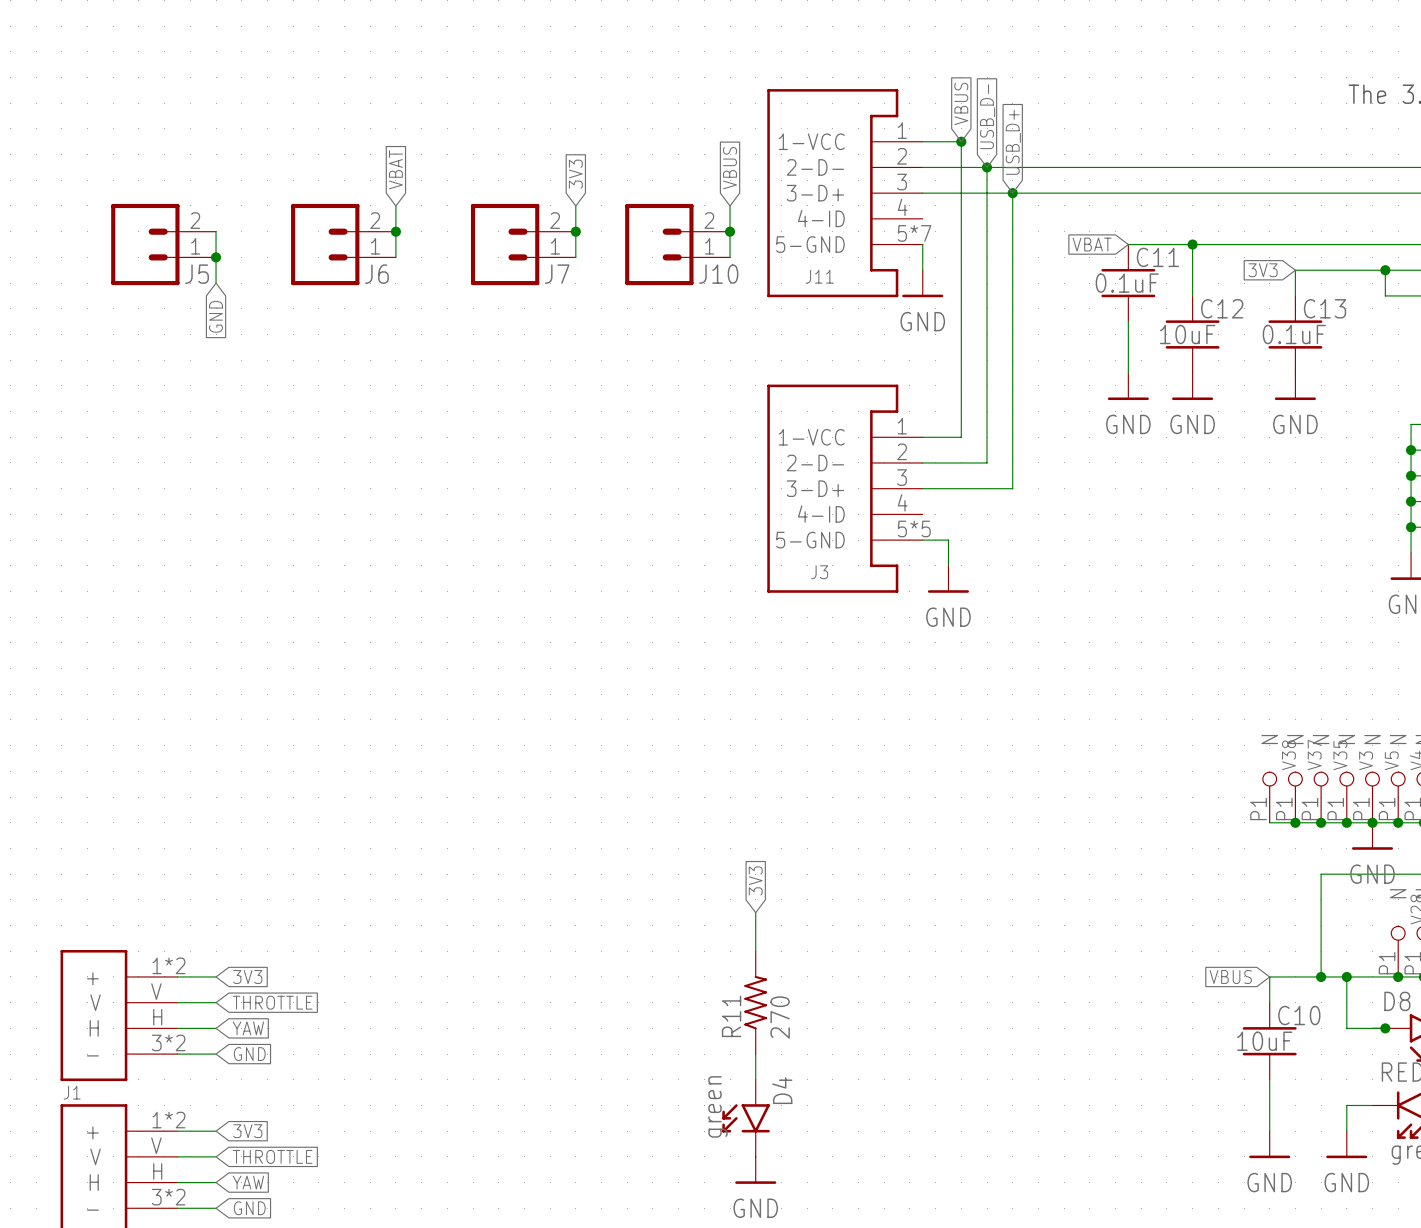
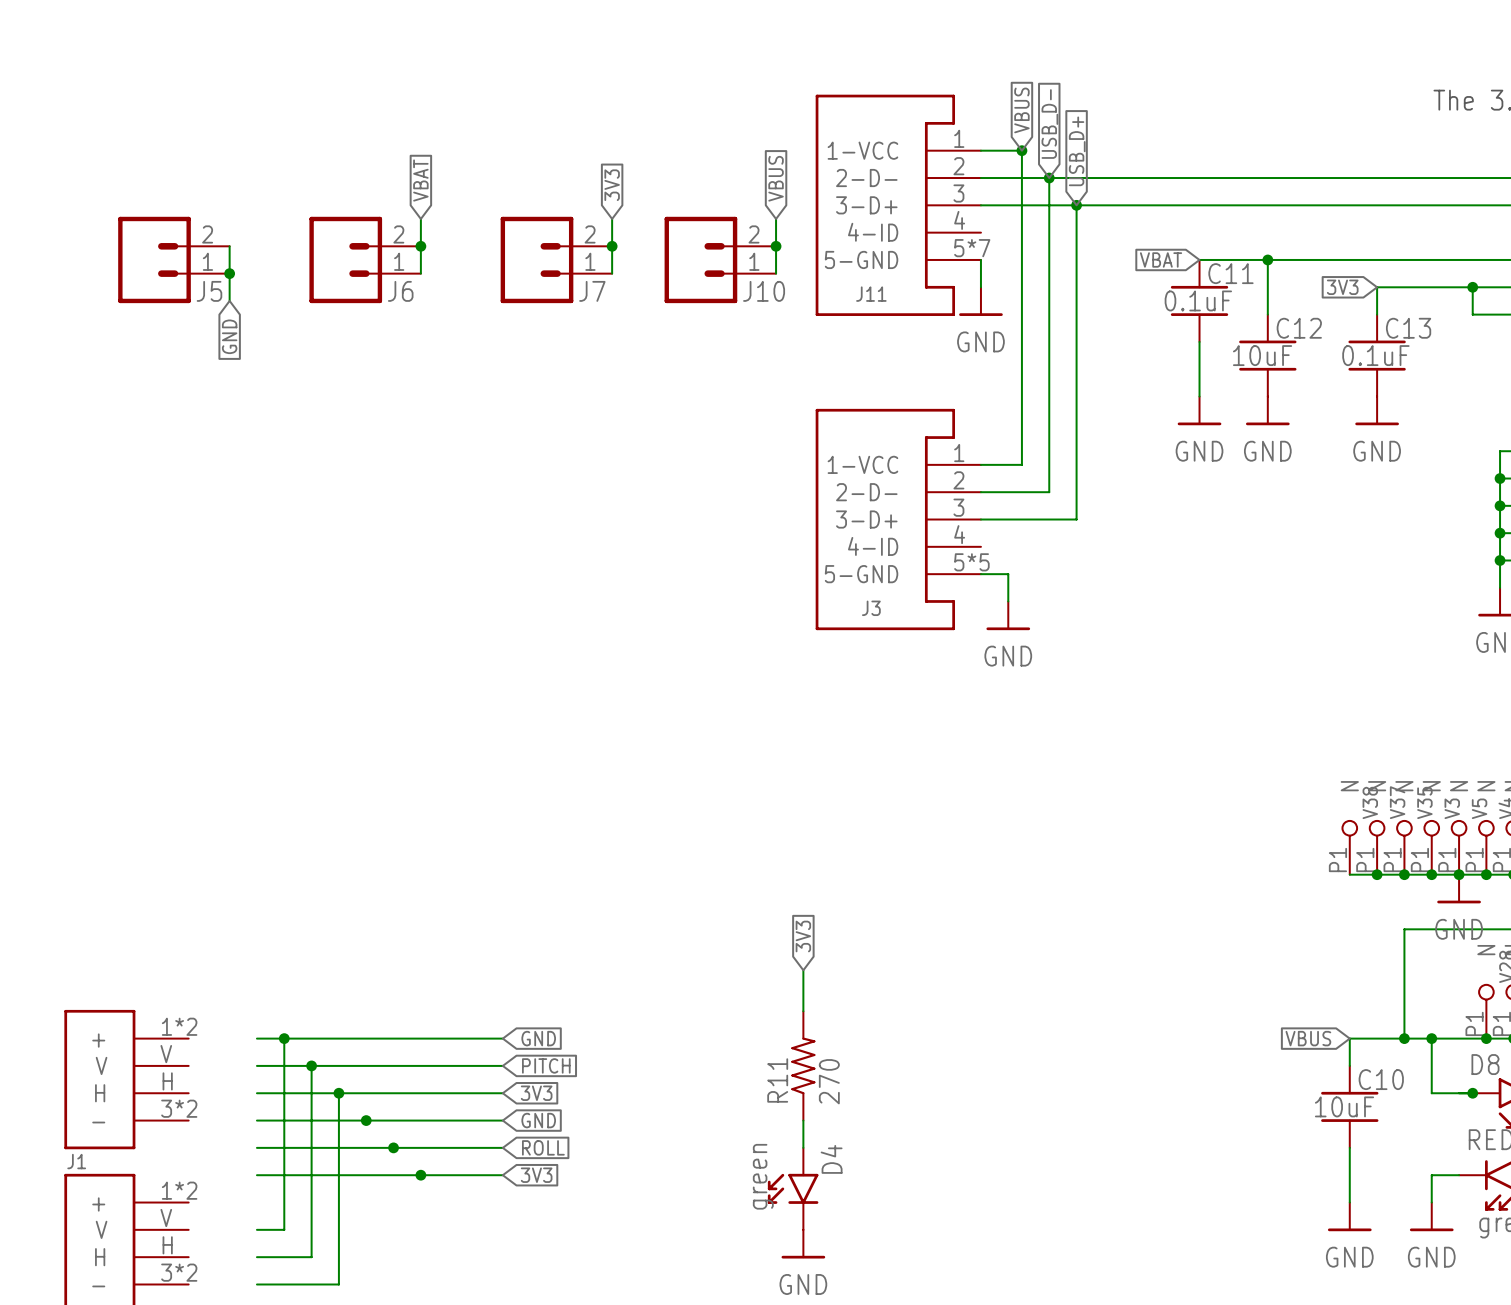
wire: (177, 976) (216, 976) -> none
wire: none -> (256, 1038) (502, 1038)
global label: 3V3 (247, 976) -> none
wire: none -> (284, 1038) (284, 1229) (256, 1229)
junction: none -> (284, 1038)
global label: none -> GND (538, 1038)
wire: (177, 1002) (216, 1002) -> none
wire: none -> (256, 1065) (502, 1065)
global label: THROTTLE (272, 1002) -> none
wire: none -> (311, 1065) (311, 1257) (256, 1257)
junction: none -> (311, 1065)
global label: none -> PITCH (546, 1065)
wire: (177, 1028) (216, 1028) -> none
wire: none -> (256, 1093) (502, 1093)
global label: YAW (248, 1028) -> none
wire: none -> (338, 1093) (338, 1284) (256, 1284)
junction: none -> (338, 1093)
global label: none -> 3V3 (536, 1093)
wire: (177, 1054) (216, 1054) -> none
wire: none -> (256, 1120) (502, 1120)
global label: GND (249, 1054) -> none
junction: none -> (366, 1120)
global label: none -> GND (538, 1120)
wire: none -> (256, 1147) (502, 1147)
junction: none -> (393, 1147)
global label: none -> ROLL (543, 1147)
wire: none -> (256, 1175) (502, 1175)
junction: none -> (420, 1175)
global label: none -> 3V3 (536, 1175)
wire: (177, 1131) (216, 1131) -> none
global label: 3V3 (247, 1131) -> none
wire: (177, 1156) (216, 1156) -> none
global label: THROTTLE (272, 1156) -> none
wire: (177, 1182) (216, 1182) -> none
global label: YAW (248, 1182) -> none
wire: (177, 1208) (216, 1208) -> none
global label: GND (249, 1208) -> none

